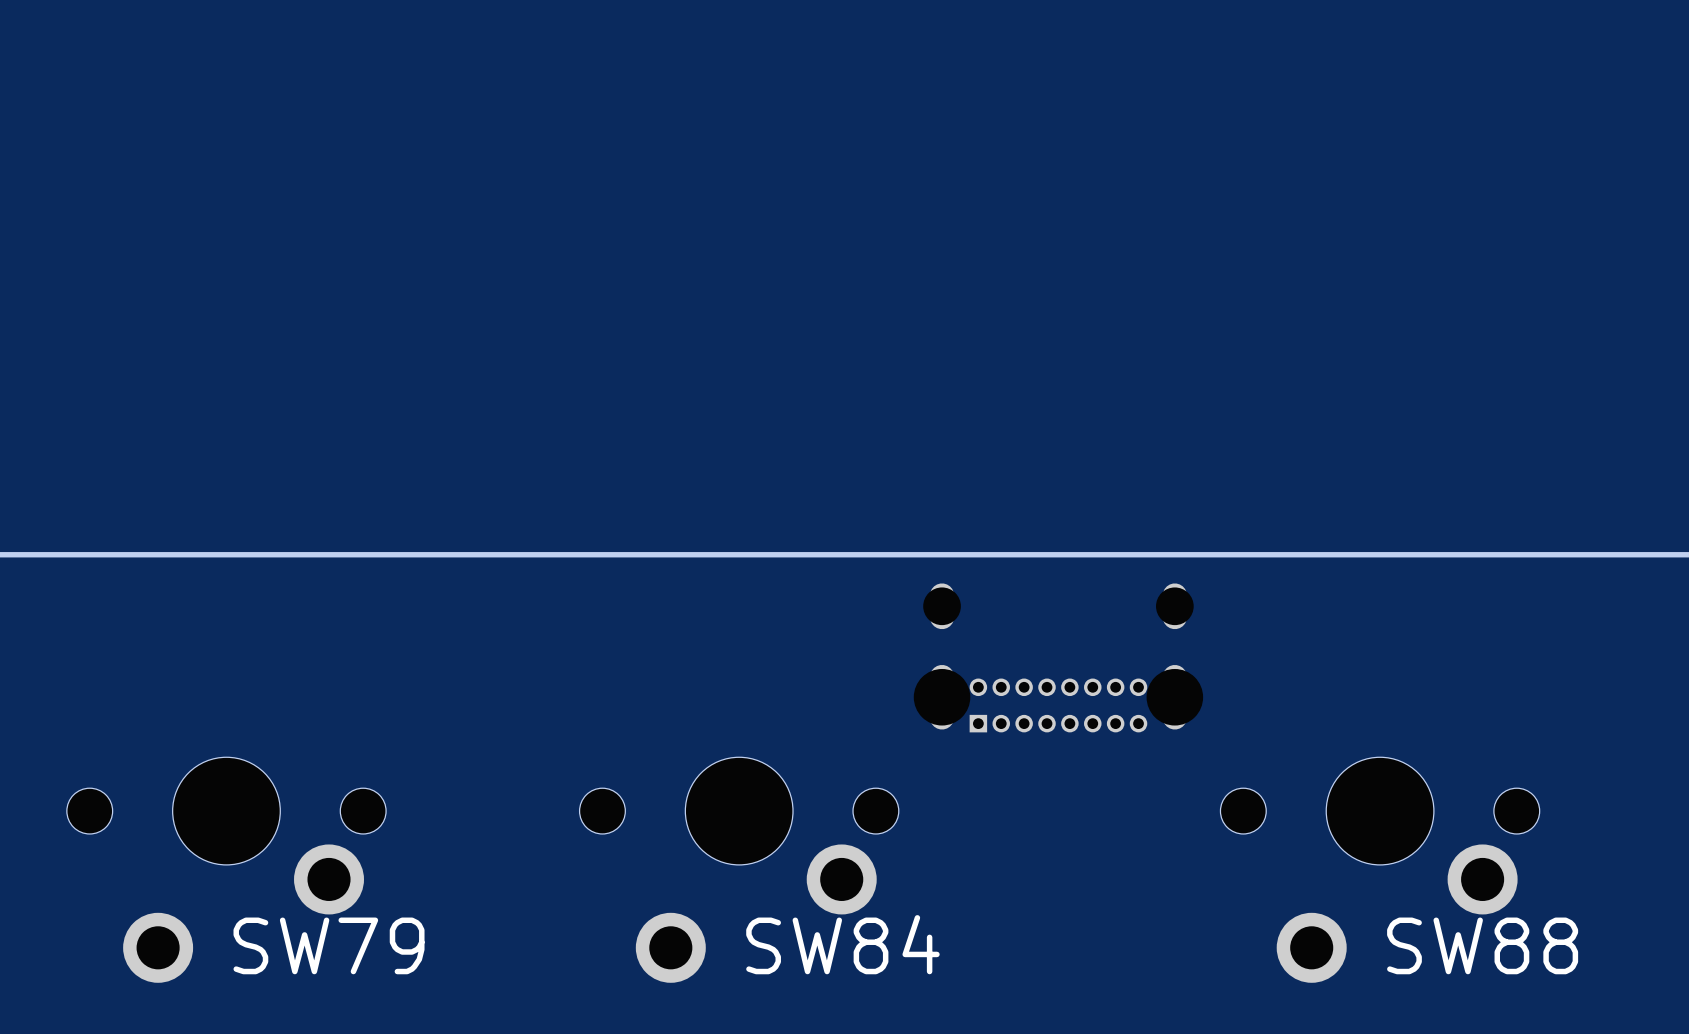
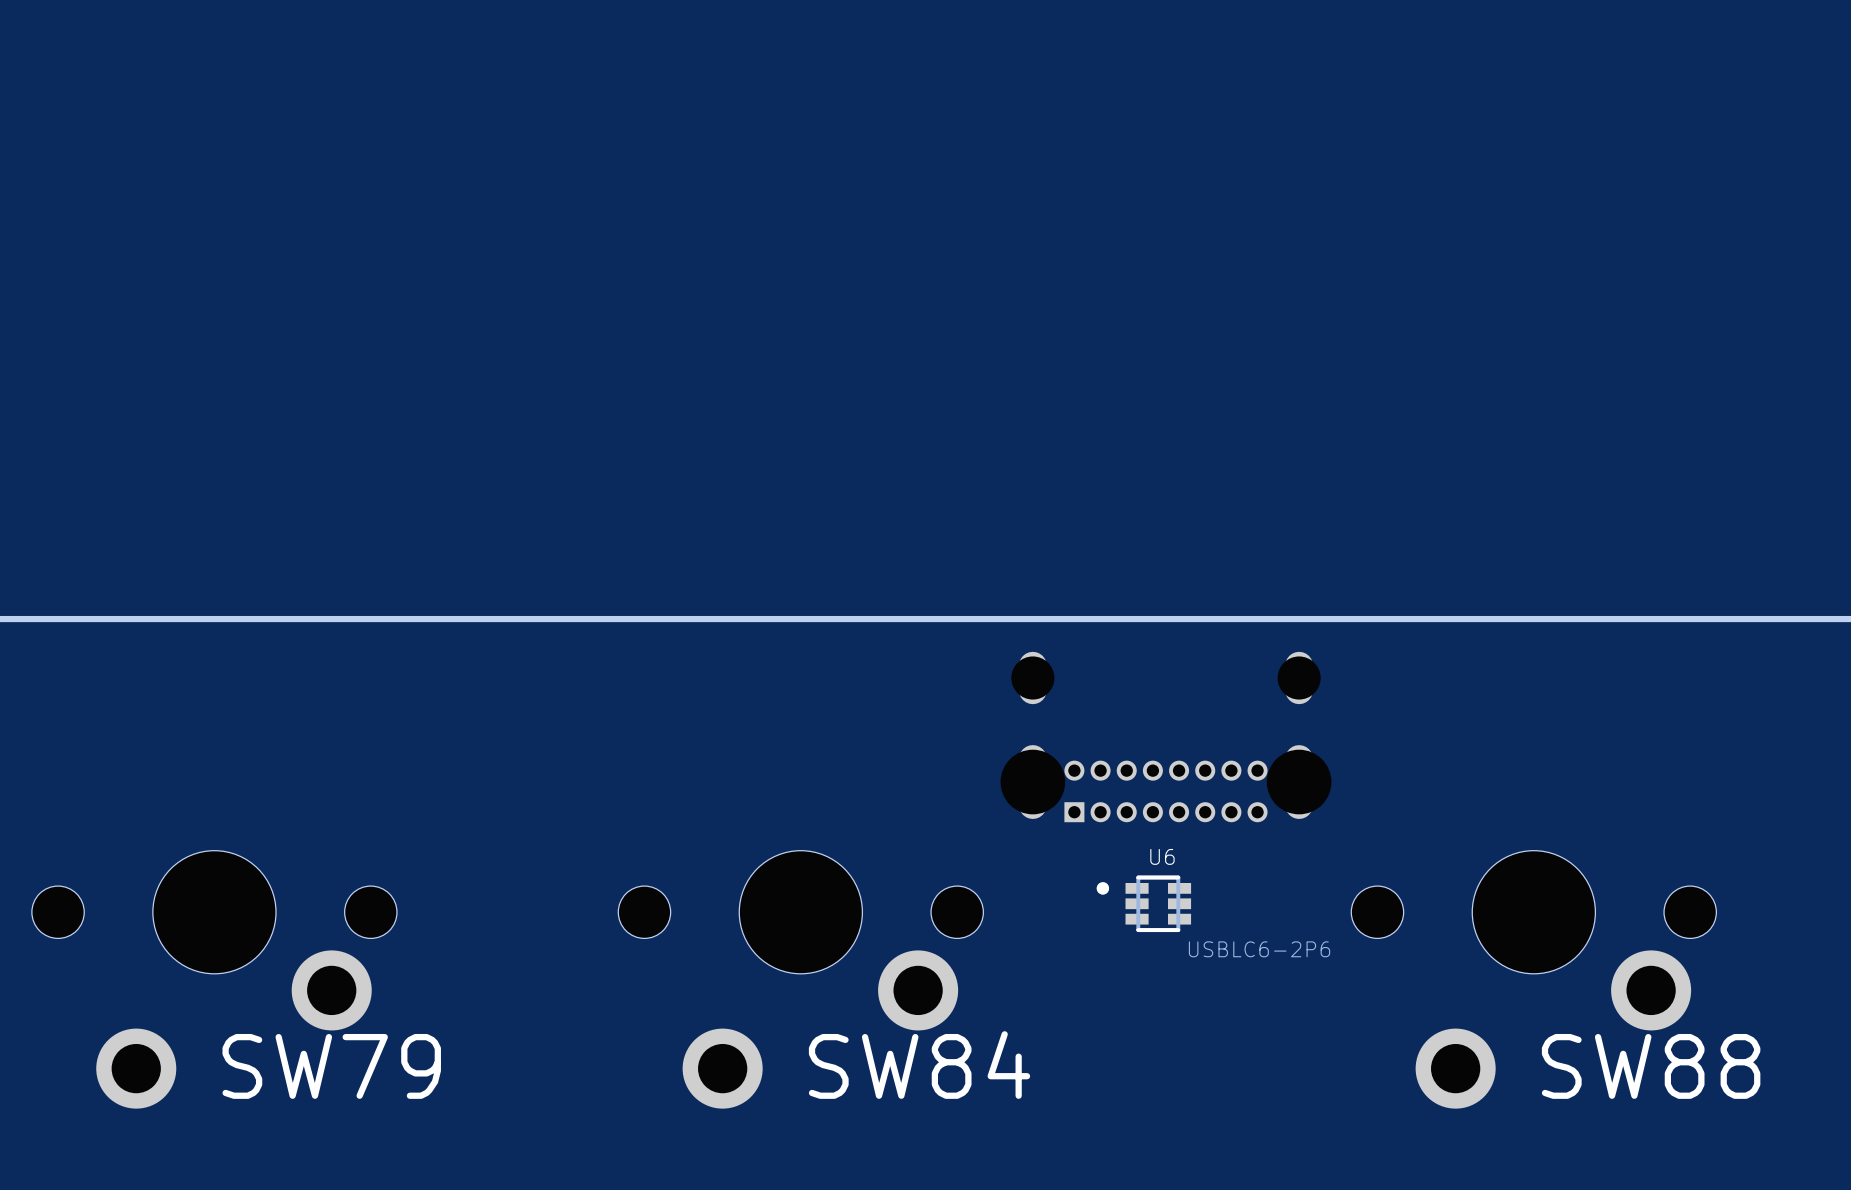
U6: none -> USBLC6-2P6 (1143, 903)

